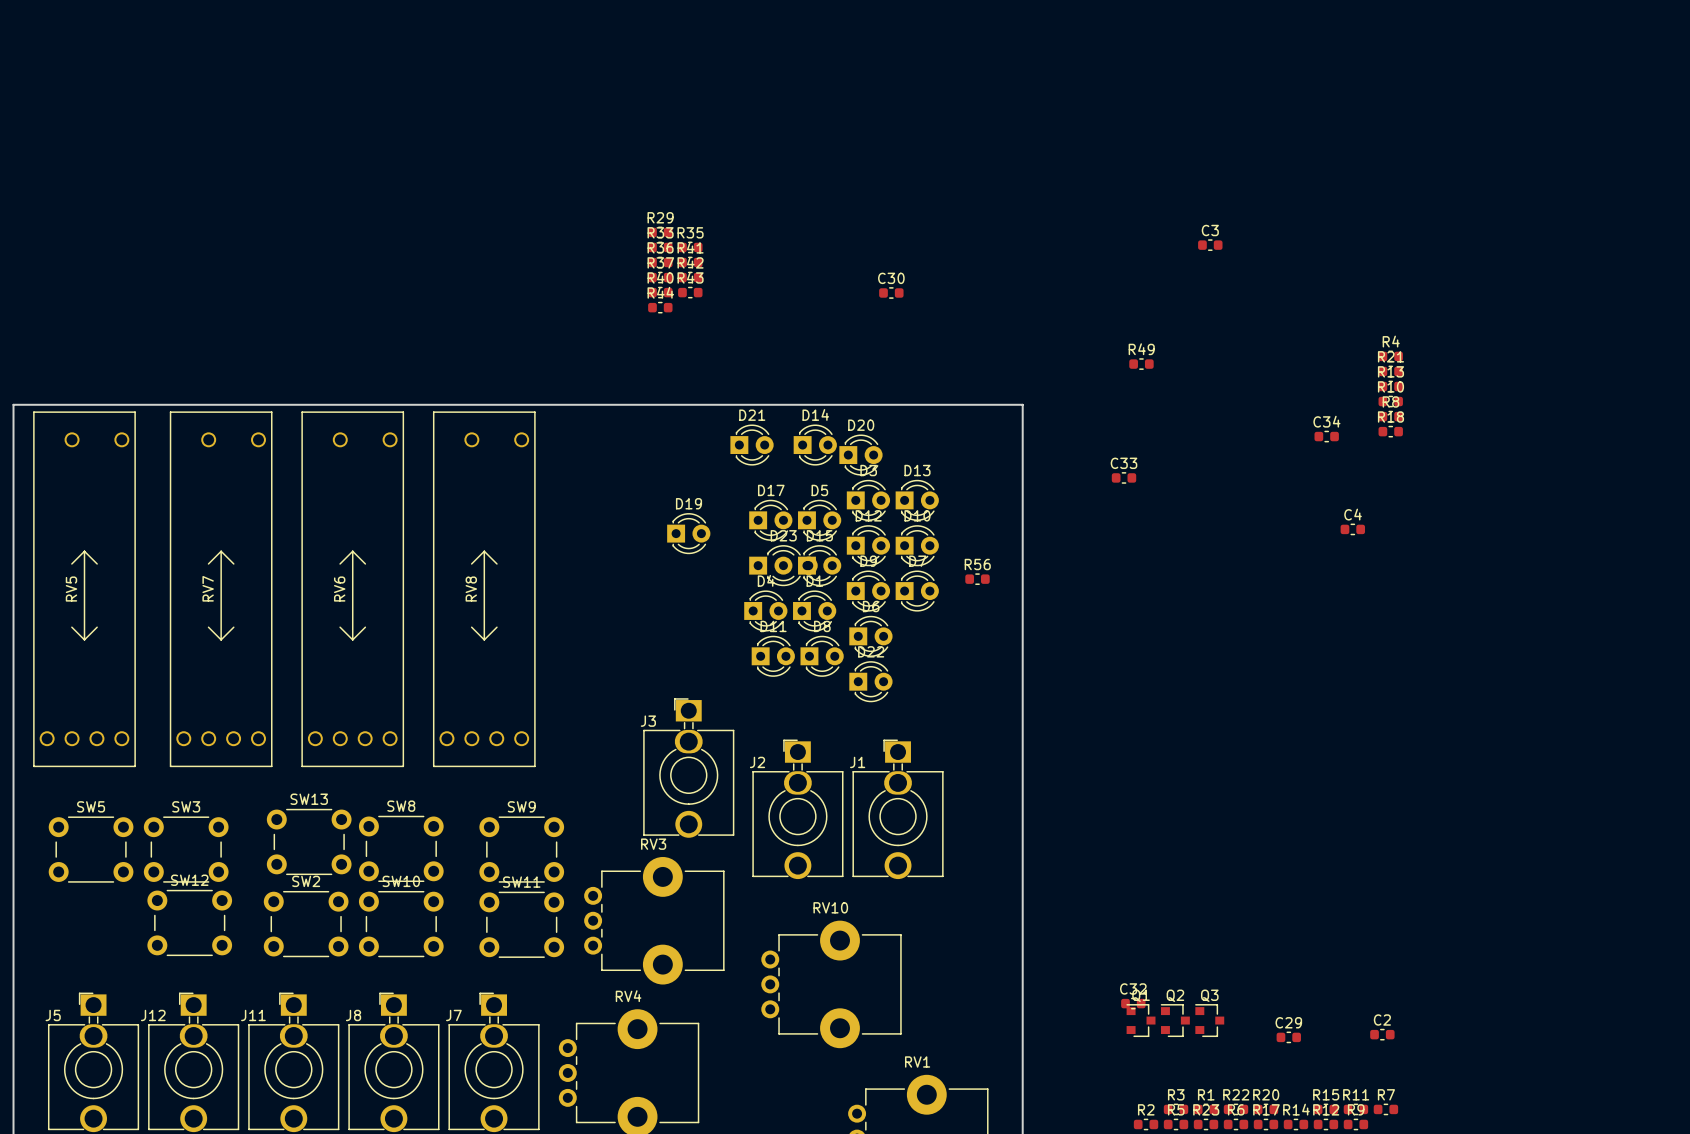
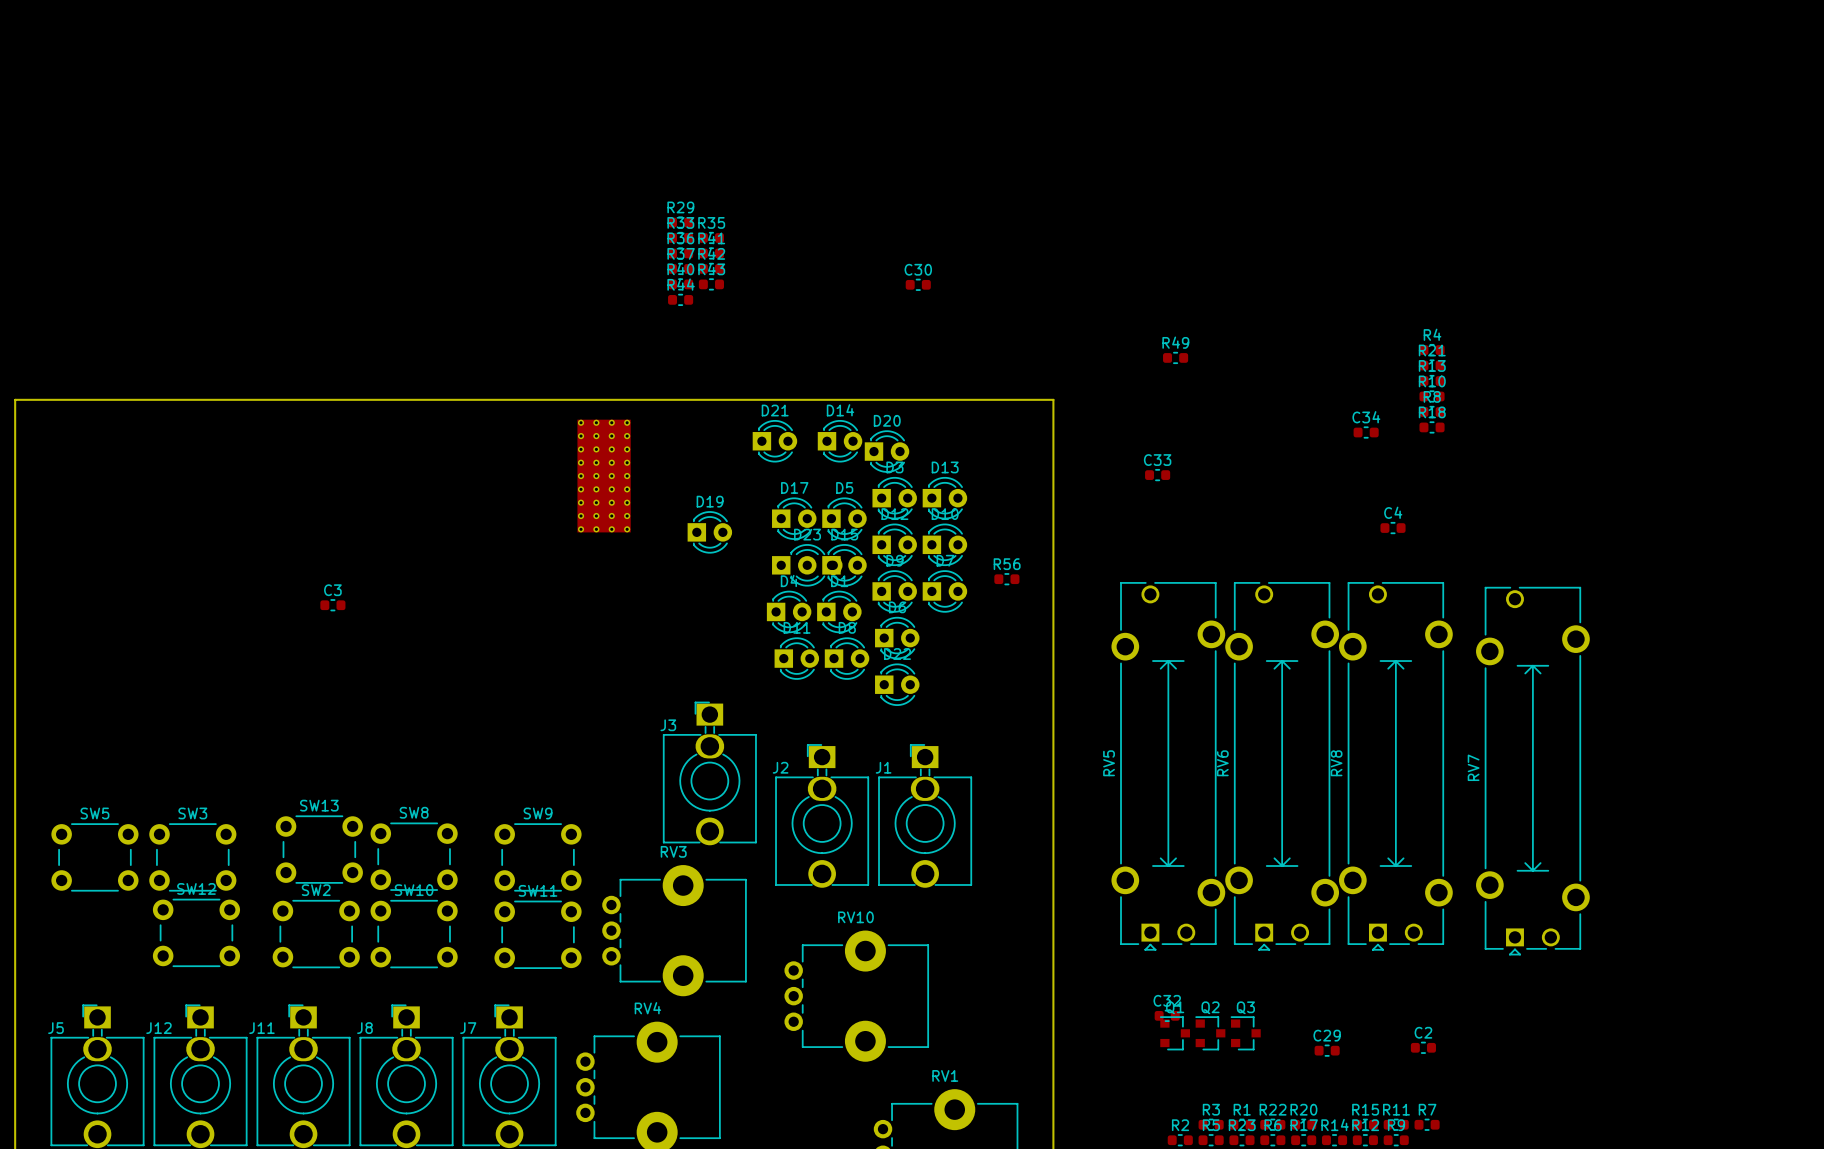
C3 position: (1210, 245) -> (332, 605)
RV5 footprint: [33, 411, 136, 768] -> [1111, 582, 1226, 951]
RV7 footprint: [169, 411, 273, 768] -> [1476, 587, 1590, 956]
RV6 footprint: [301, 411, 405, 768] -> [1225, 582, 1340, 951]
RV8 footprint: [432, 411, 536, 768] -> [1339, 582, 1453, 951]
part: none -> (604, 476)
RV7 name position: RV7 (208, 588) -> RV7 (1473, 767)
RV5 name position: RV5 (71, 589) -> RV5 (1109, 763)
RV6 name position: RV6 (339, 589) -> RV6 (1222, 763)
RV8 name position: RV8 (471, 589) -> RV8 (1336, 763)

